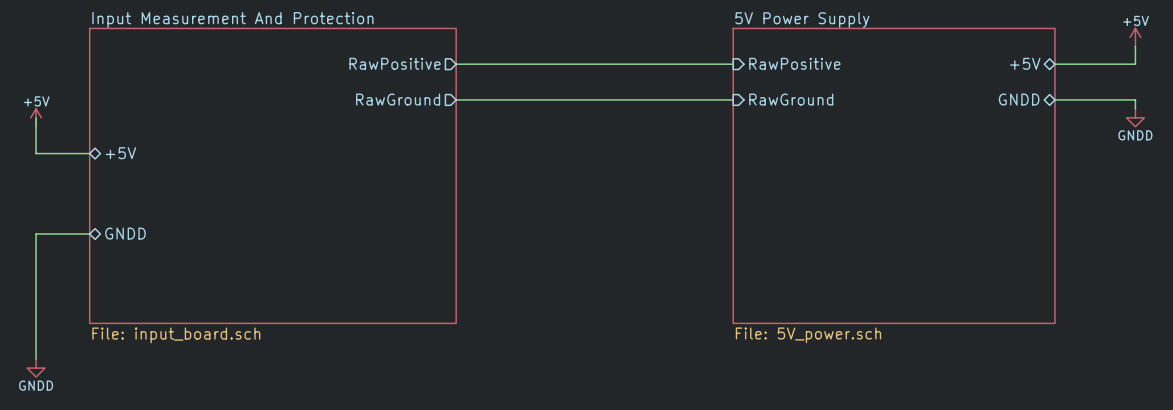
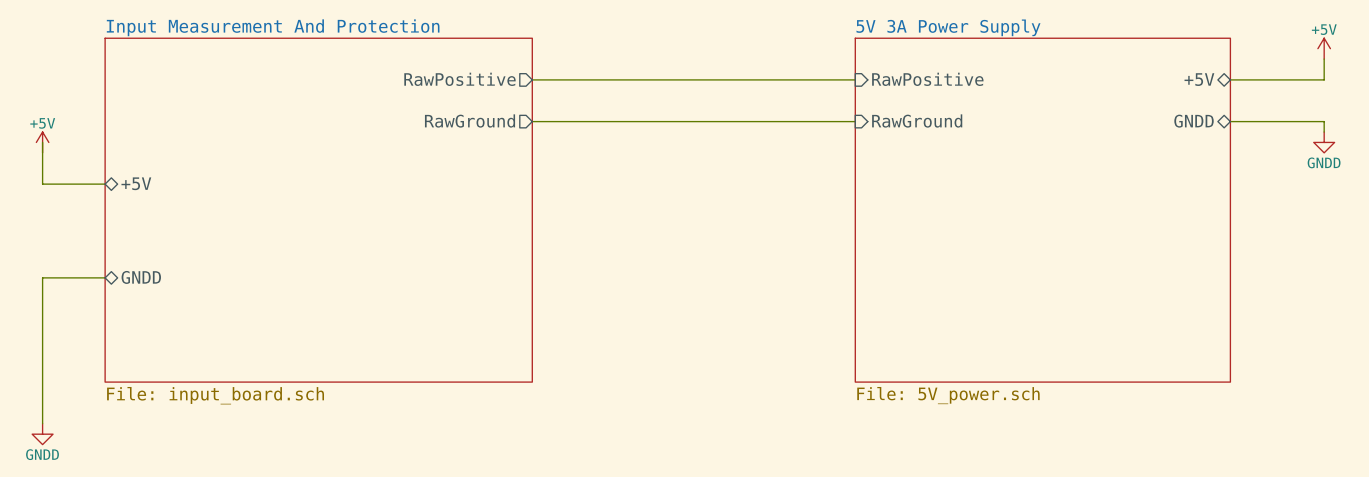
sheet 5V Power Supply name: 5V Power Supply (802, 20) -> 5V 3A Power Supply (948, 27)

